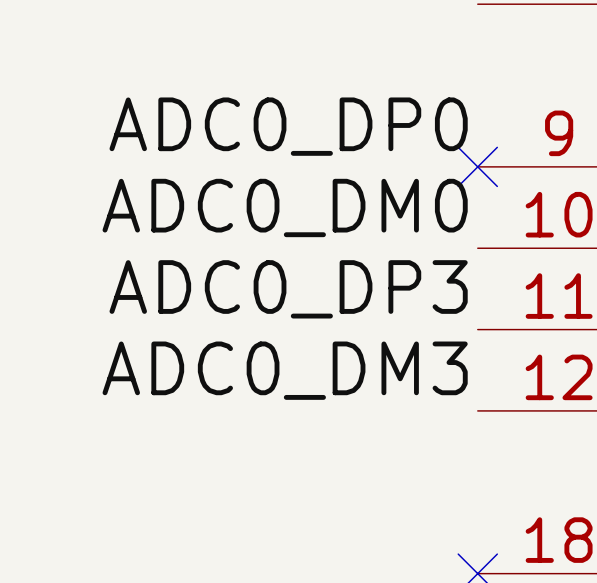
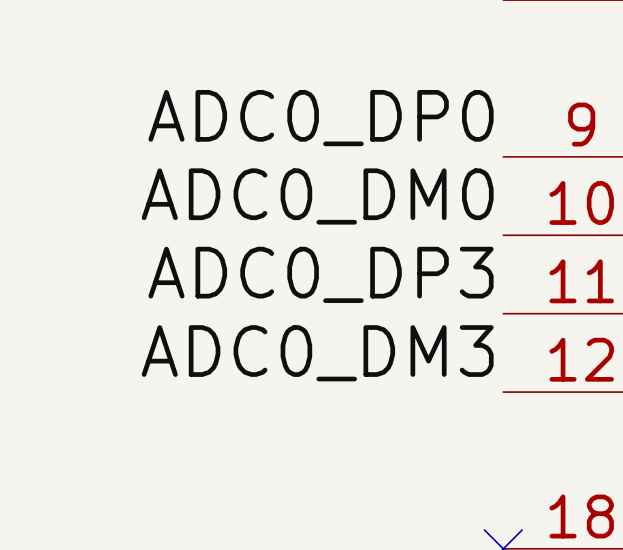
no-connect mark: (477, 166) -> none

